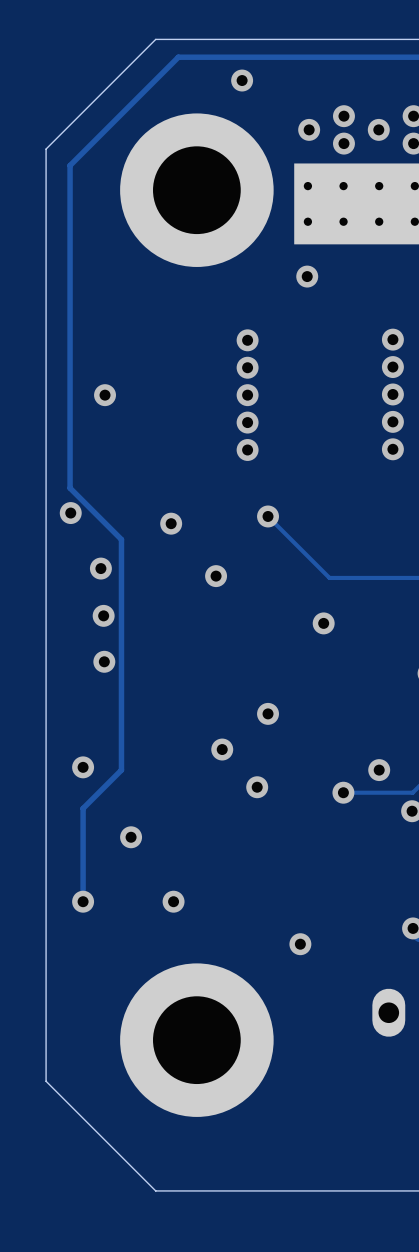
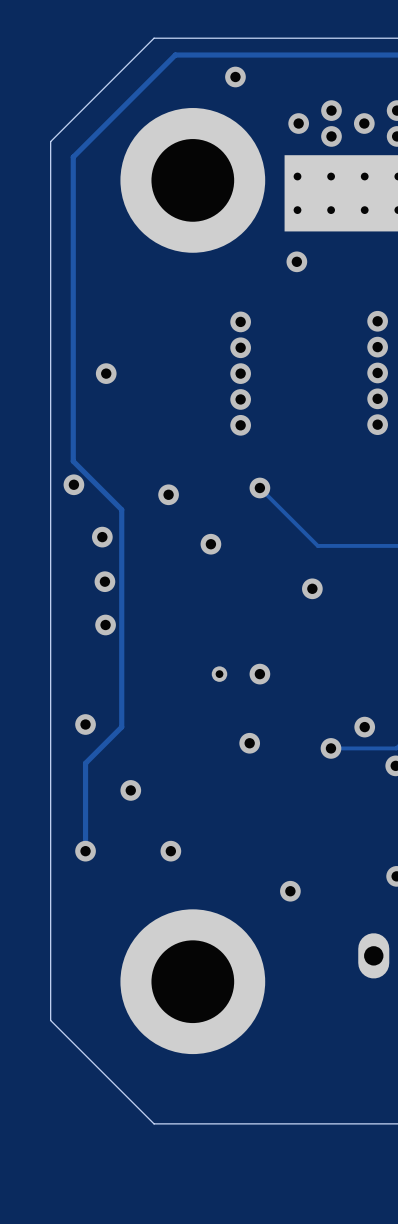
via: none -> (219, 674)
via: (222, 749) -> none

